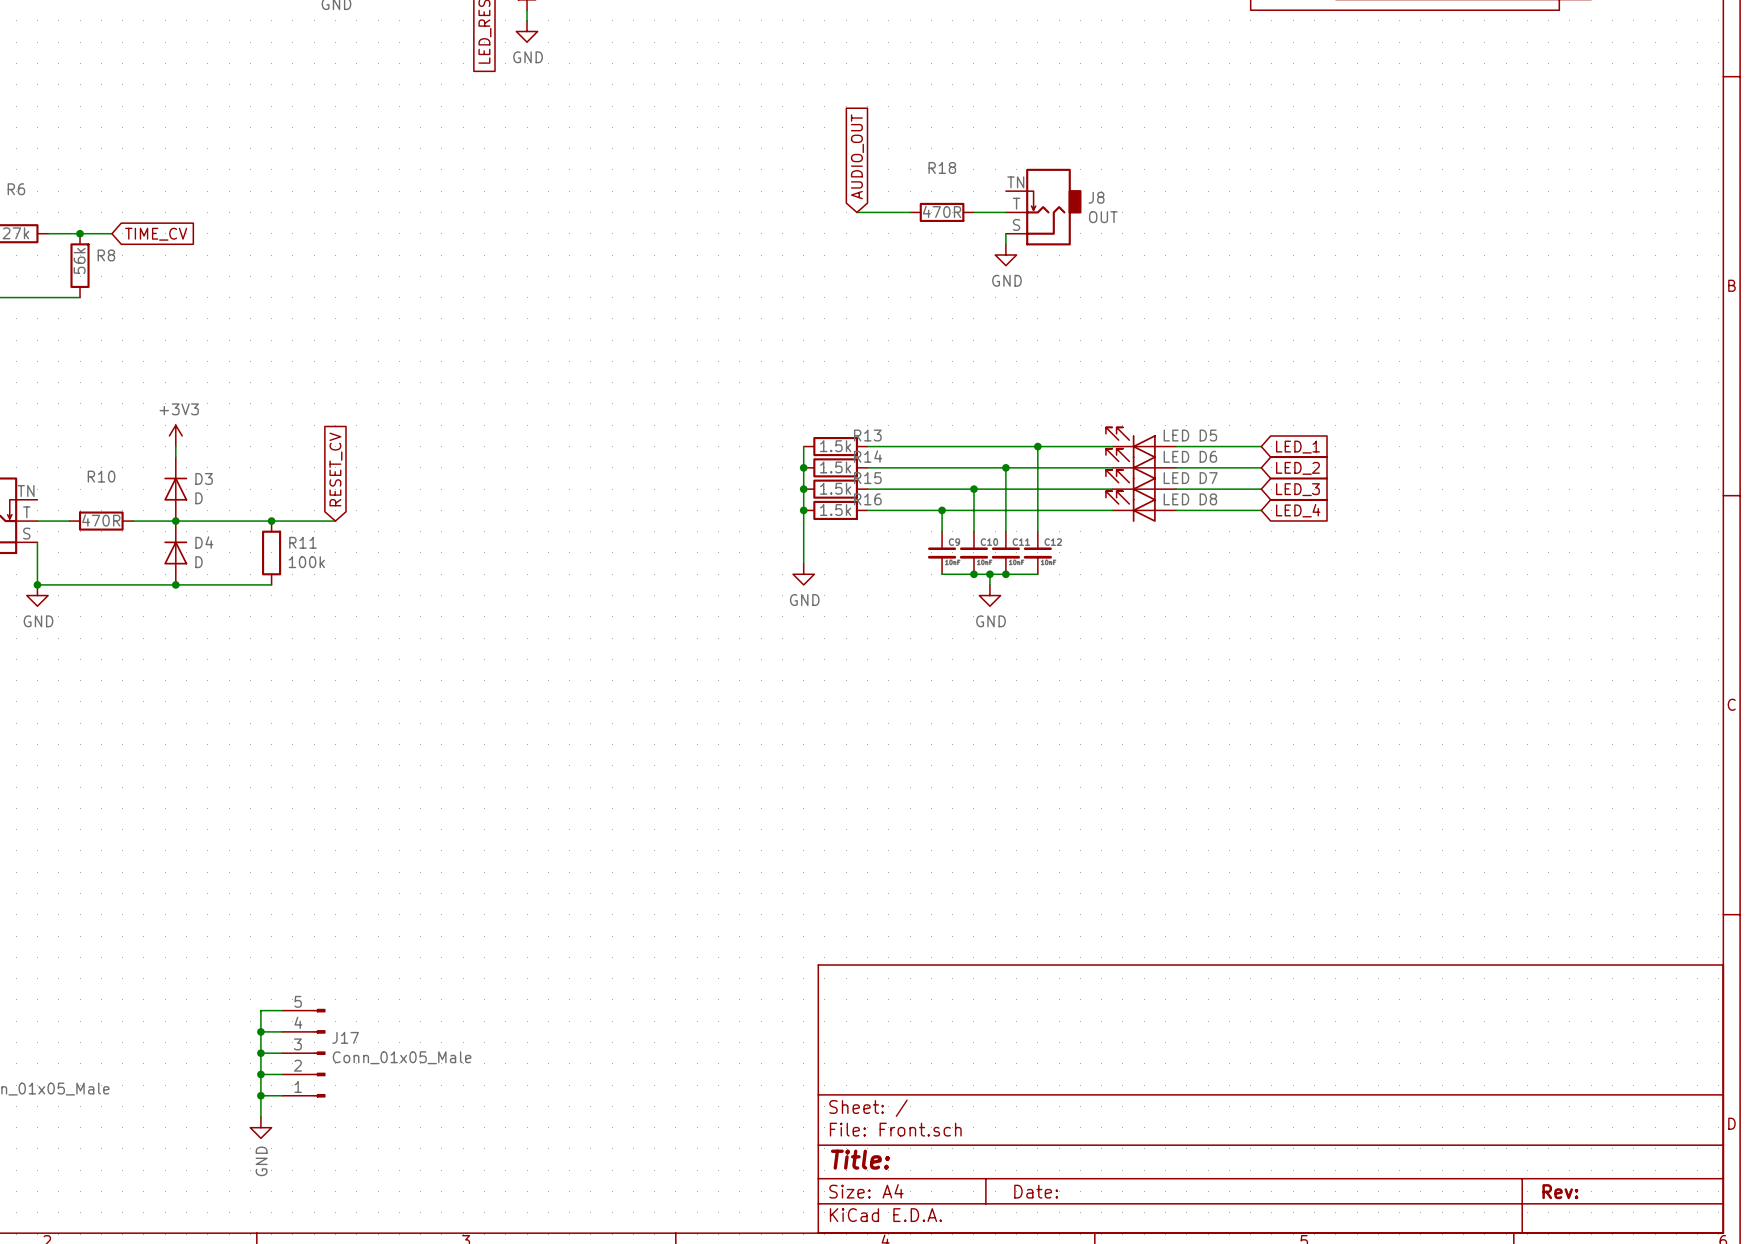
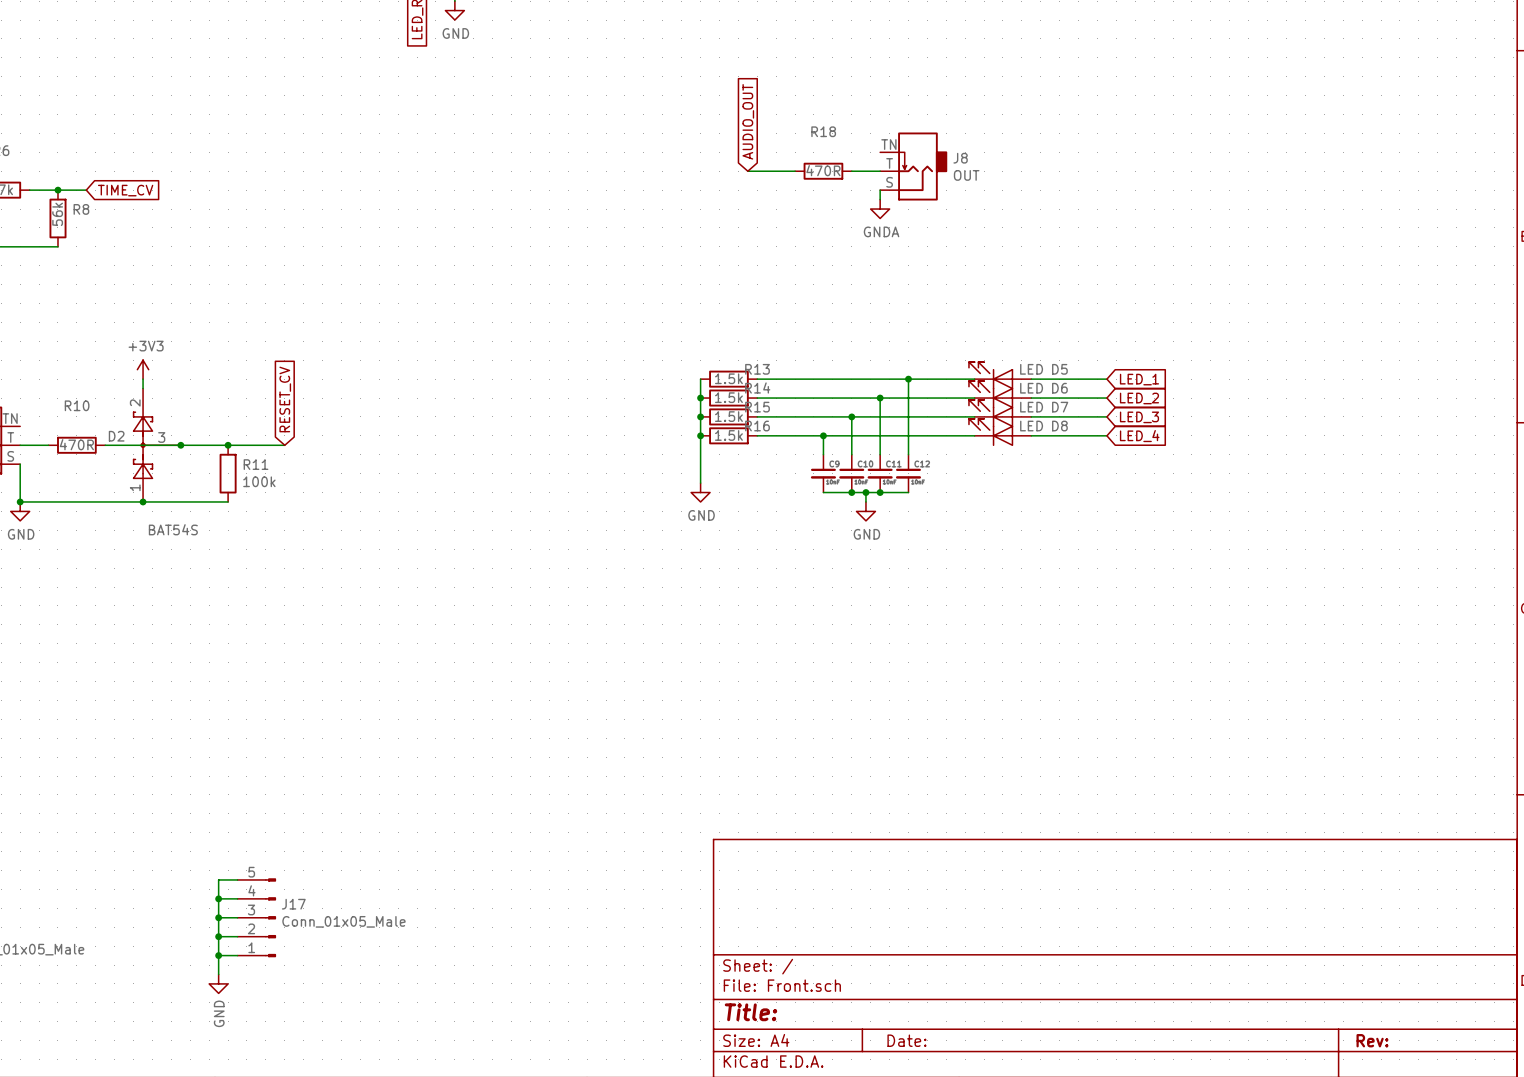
power symbol: GND (1005, 255) -> GNDA (880, 209)
D3: D (175, 489) -> none
junction position: (175, 521) -> (180, 445)
D2: none -> BAT54S (157, 445)
D4: D (175, 552) -> none

